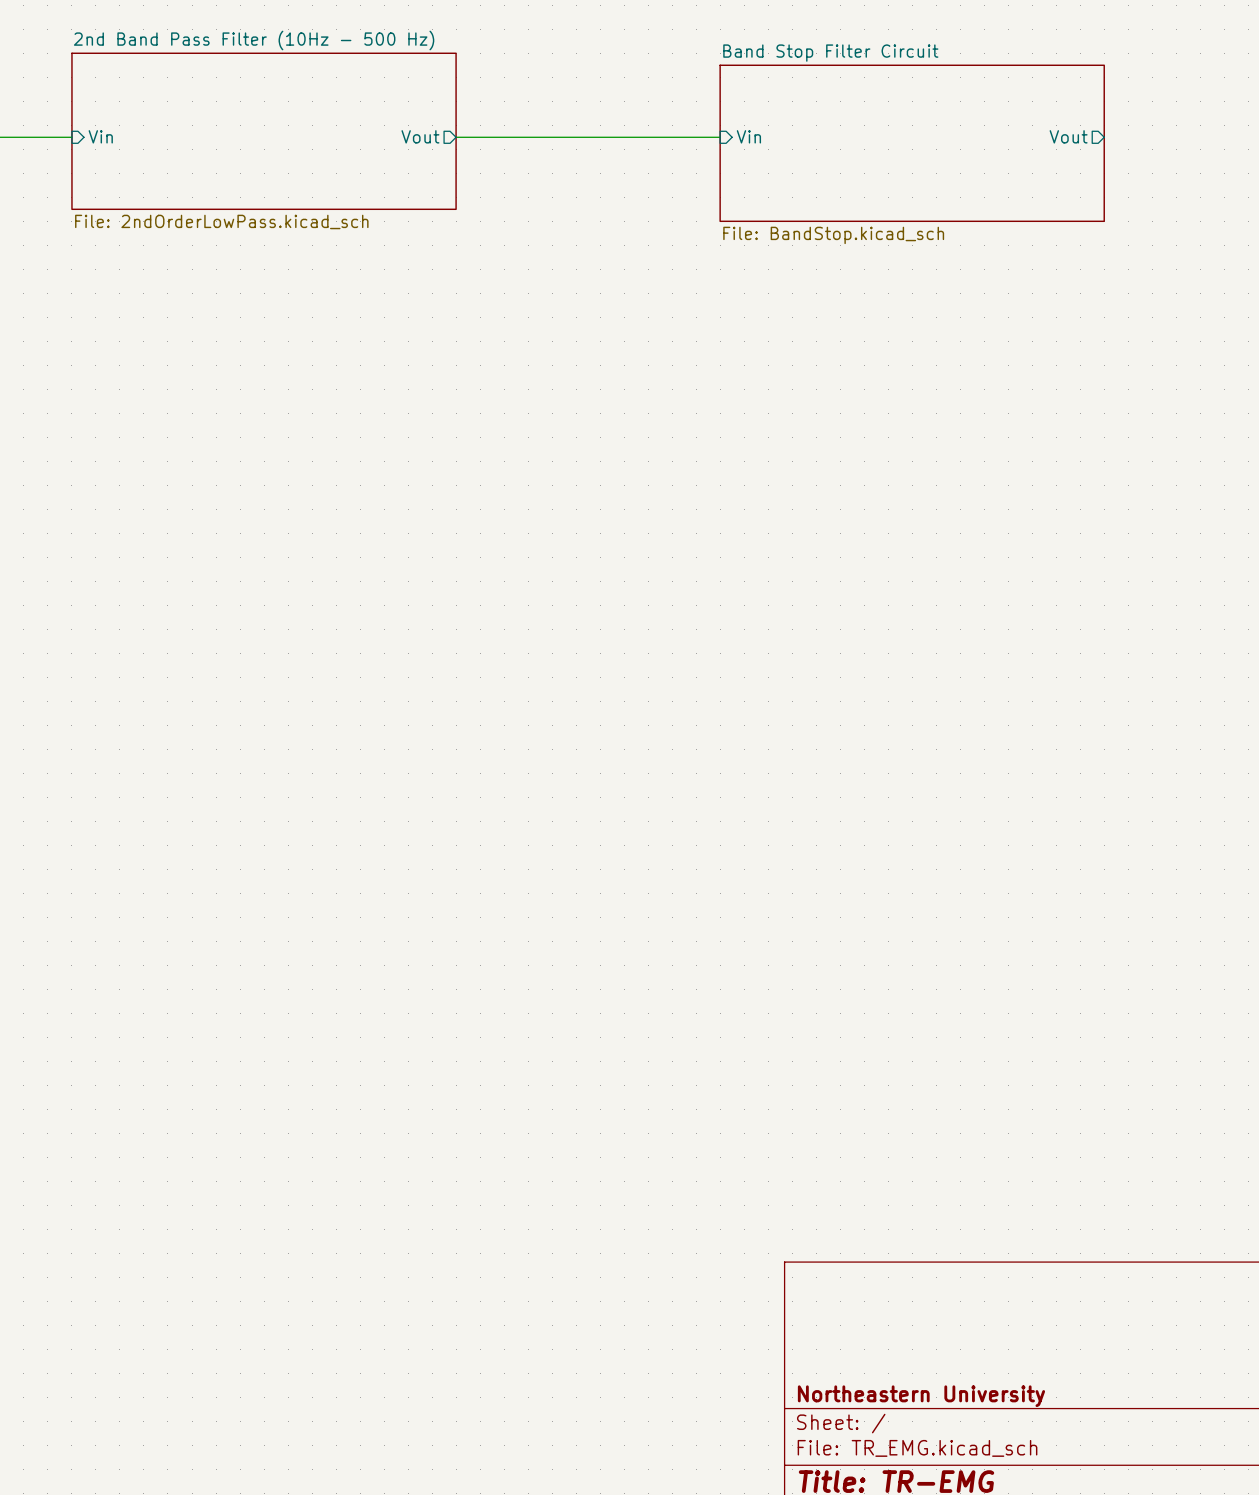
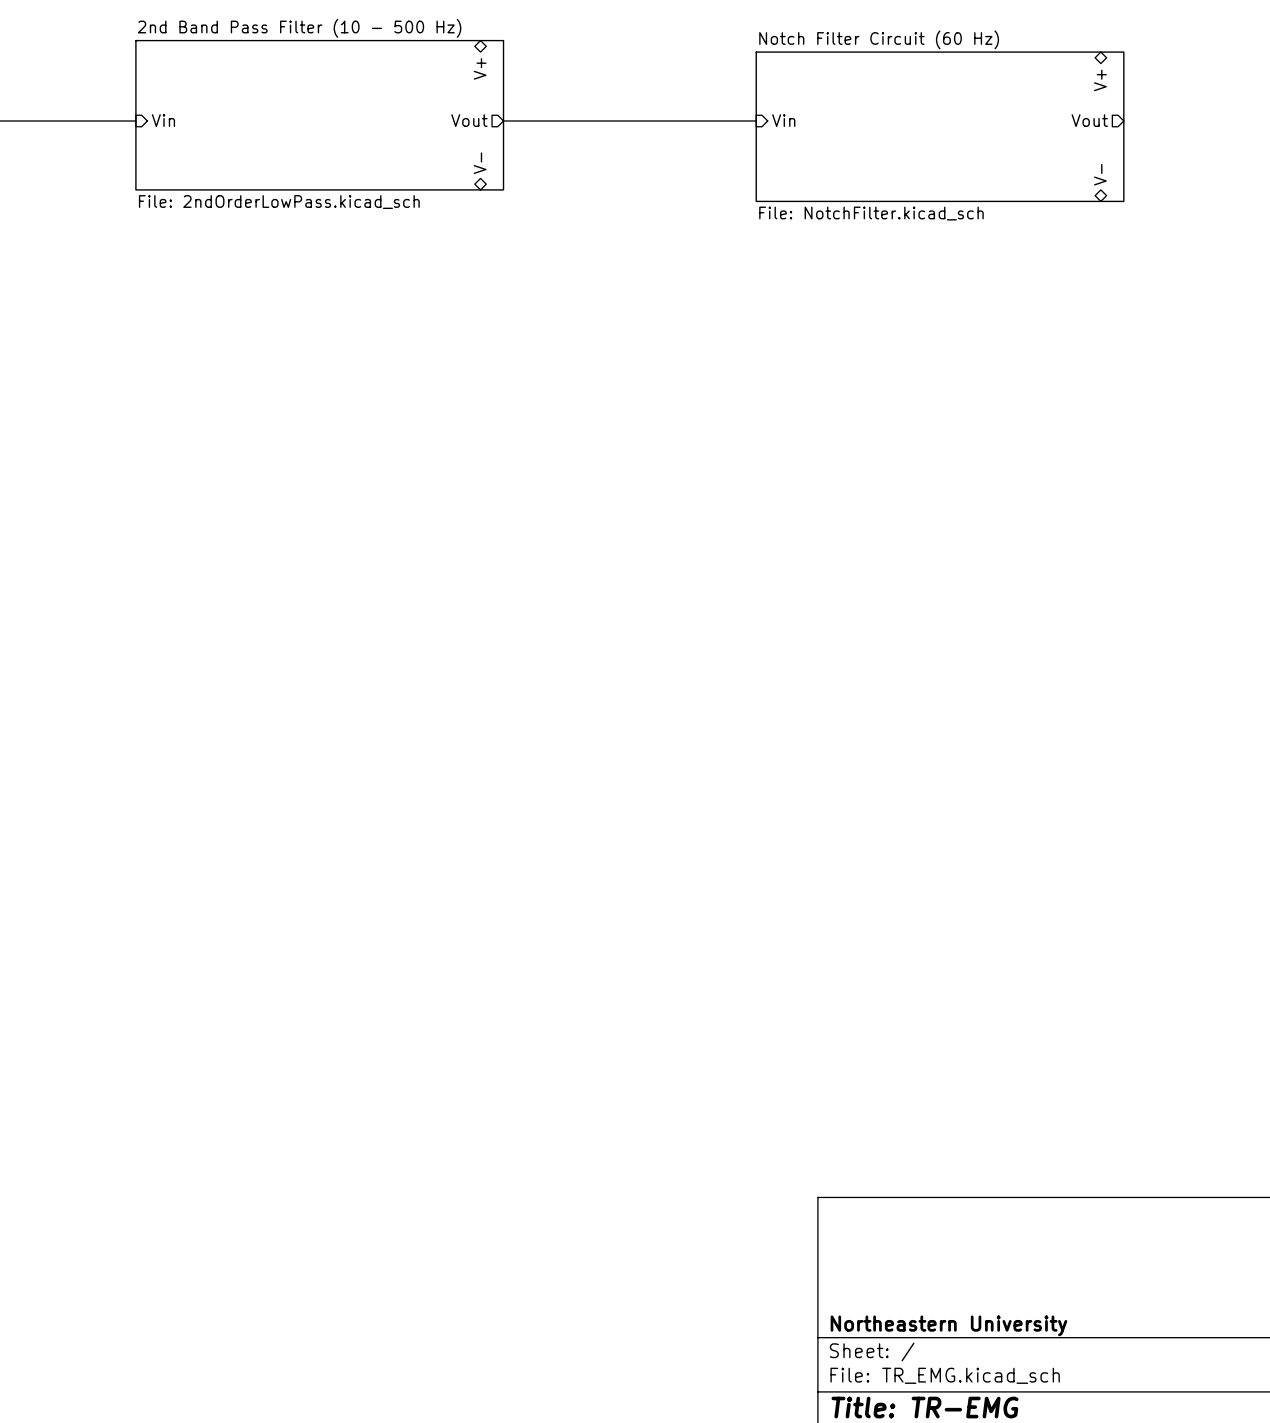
sheet 2nd Band Pass Filter (10Hz - 500 Hz) name: 2nd Band Pass Filter (10Hz - 500 Hz) (254, 40) -> 2nd Band Pass Filter (10 - 500 Hz) (299, 28)
sheet Band Stop Filter Circuit name: Band Stop Filter Circuit (830, 53) -> Notch Filter Circuit (60 Hz) (879, 39)
sheet pin: none -> V+ (480, 68)
sheet pin: none -> V+ (1100, 80)
sheet pin: none -> V- (480, 163)
sheet pin: none -> V- (1100, 174)
sheet Band Stop Filter Circuit value: File: BandStop.kicad_sch (833, 235) -> File: NotchFilter.kicad_sch (871, 213)

